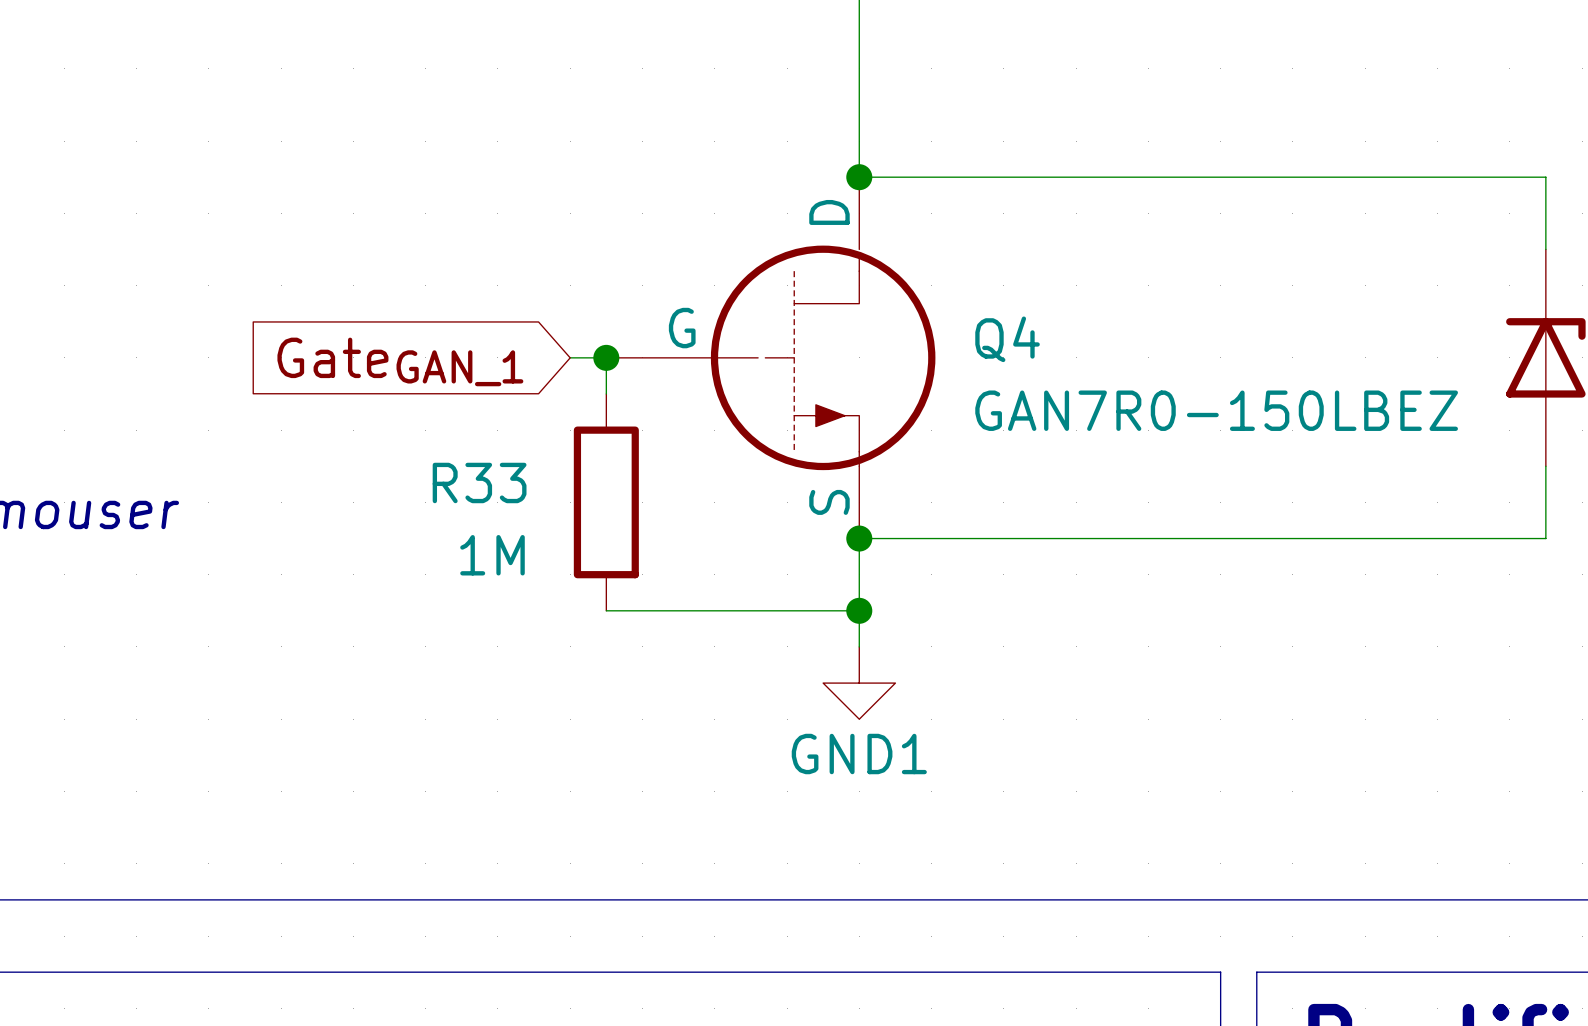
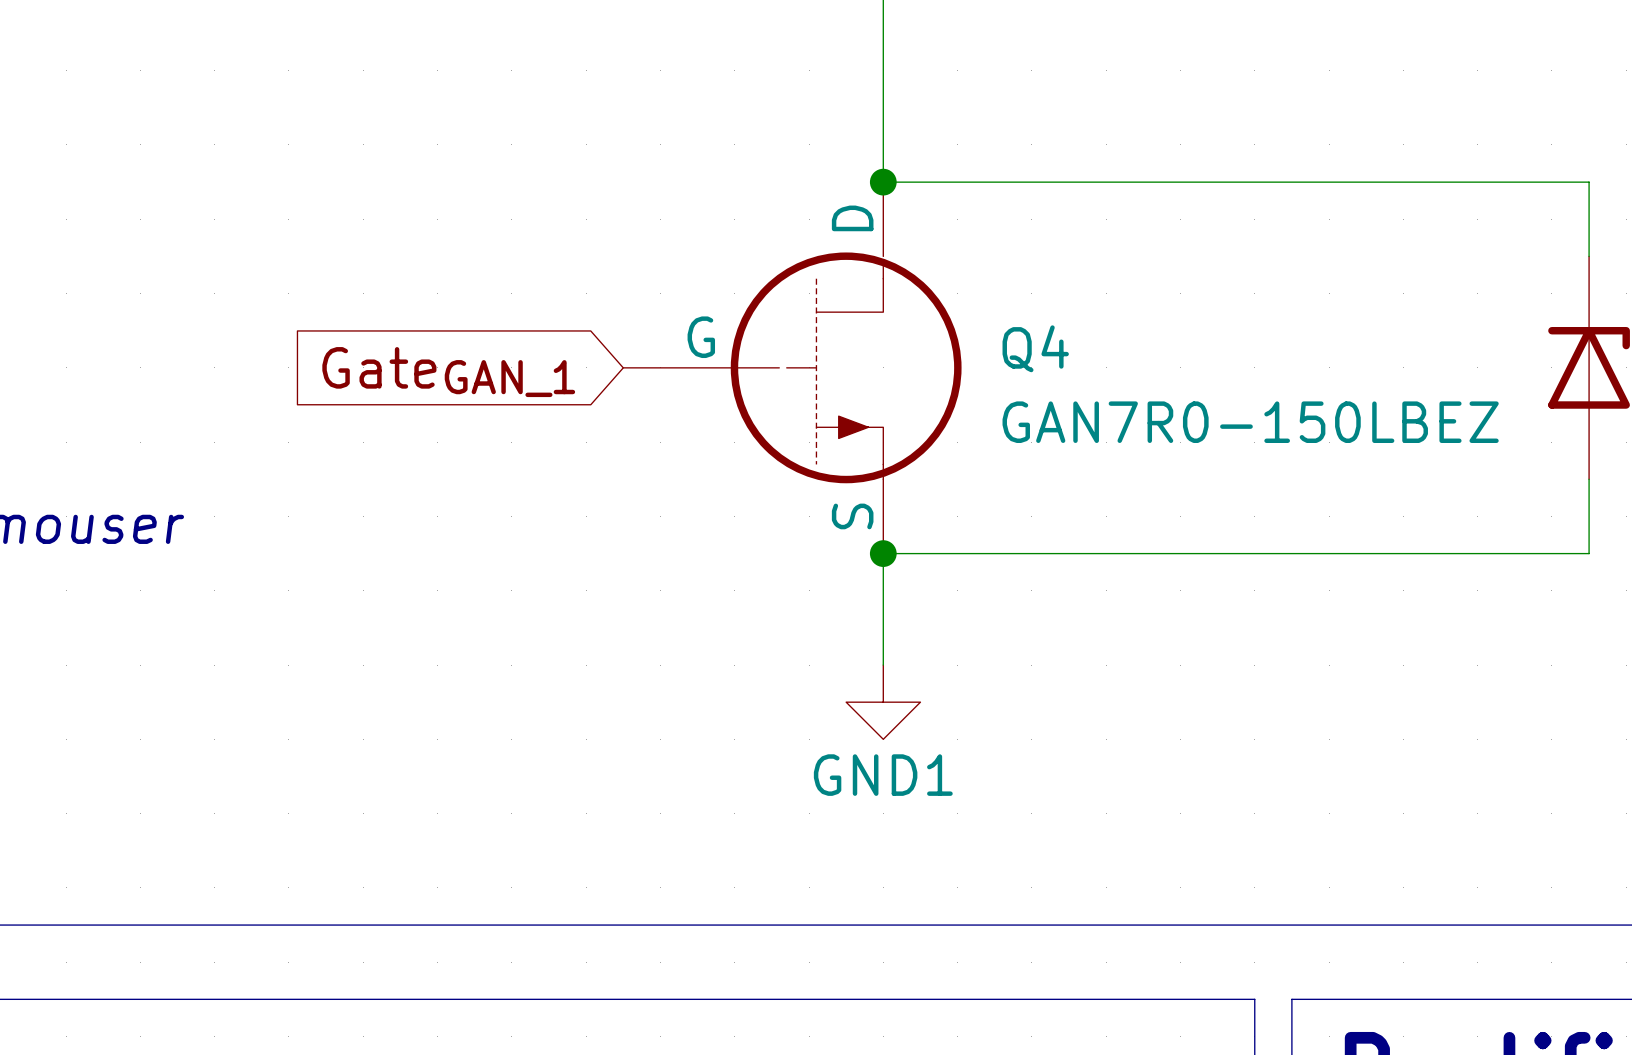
wire: (570, 357) (606, 357) (606, 394) -> none
junction: (606, 357) -> none
global label position: GateGAN_1 (400, 361) -> GateGAN_1 (448, 372)
R33: 1M (606, 502) -> none
wire: (606, 610) (859, 610) -> none
junction: (859, 610) -> none

